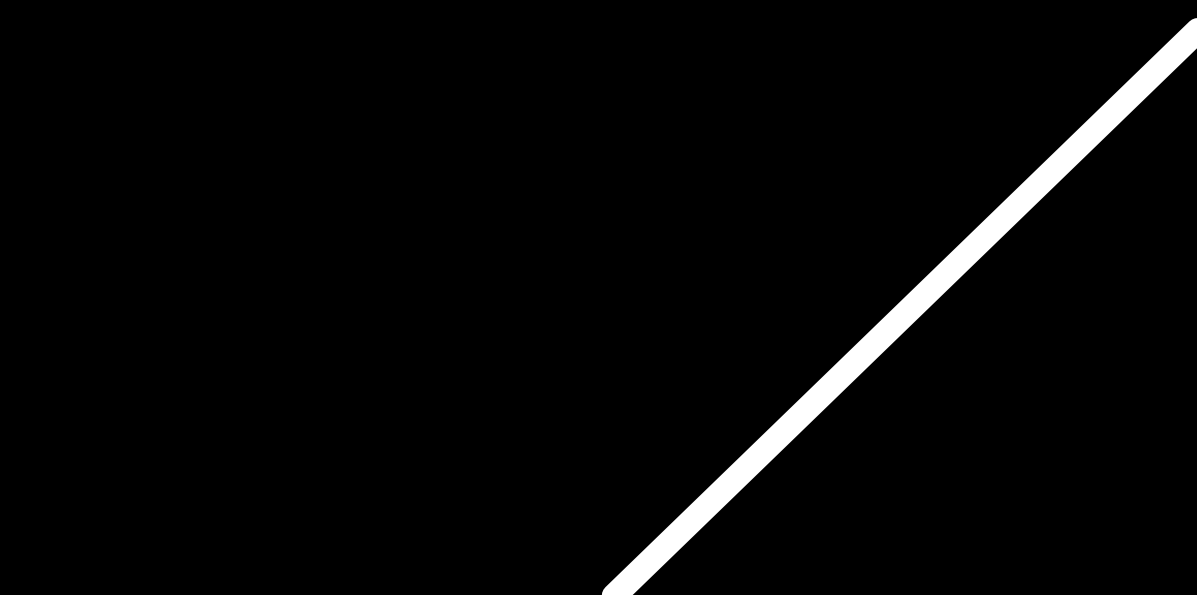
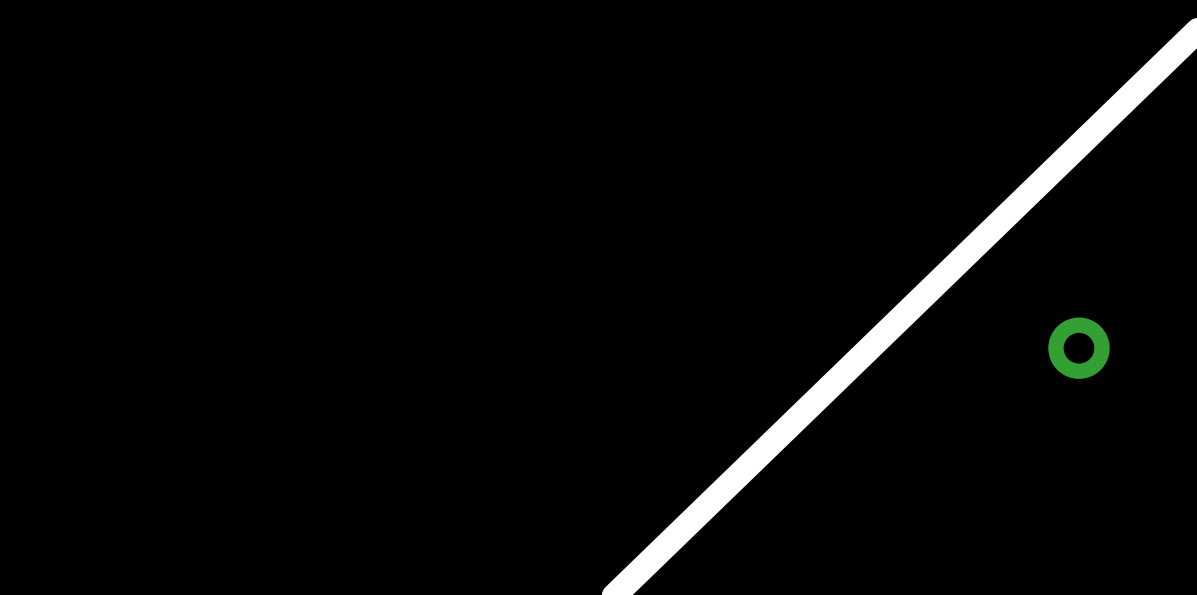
via: none -> (1078, 348)

